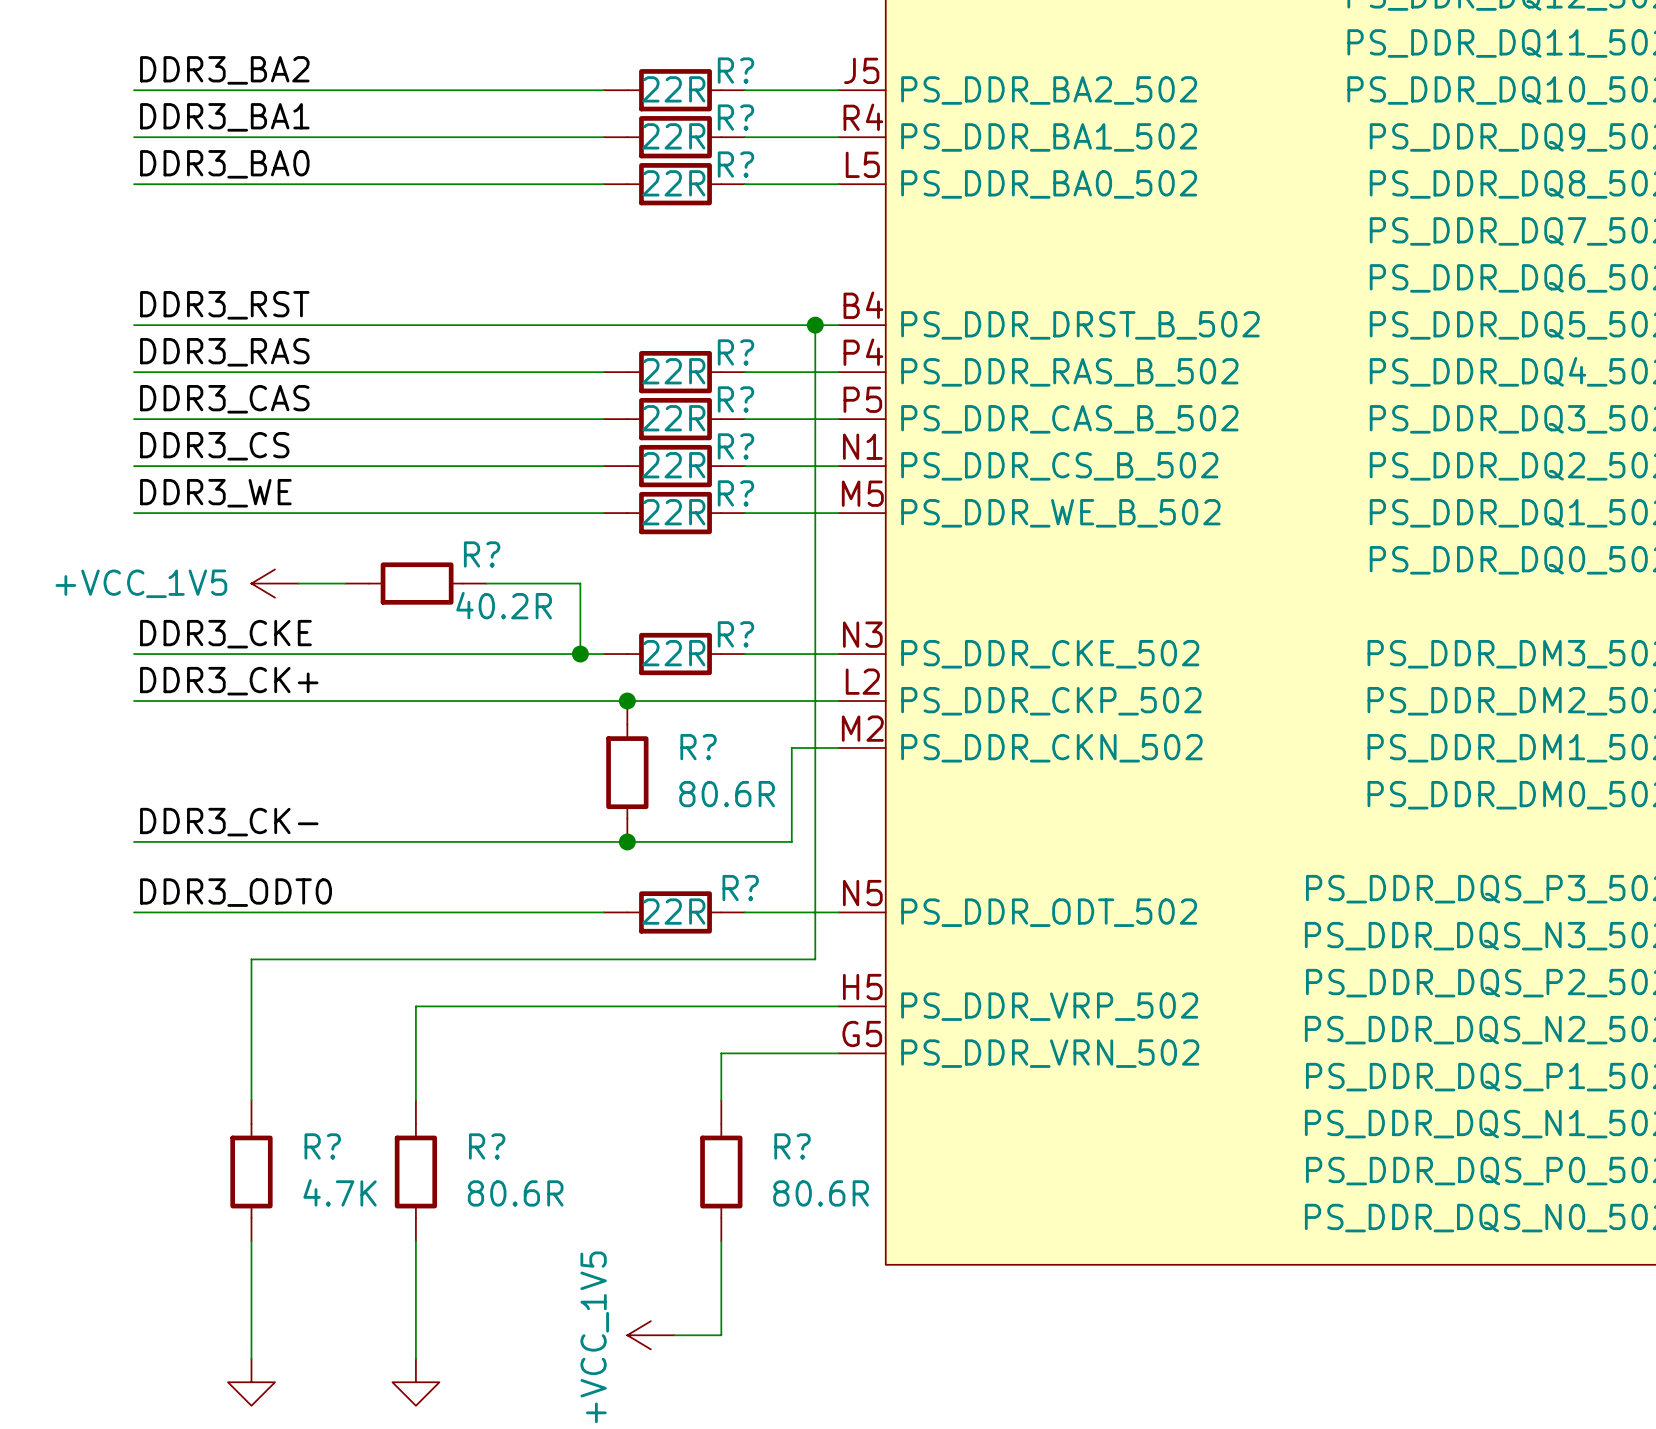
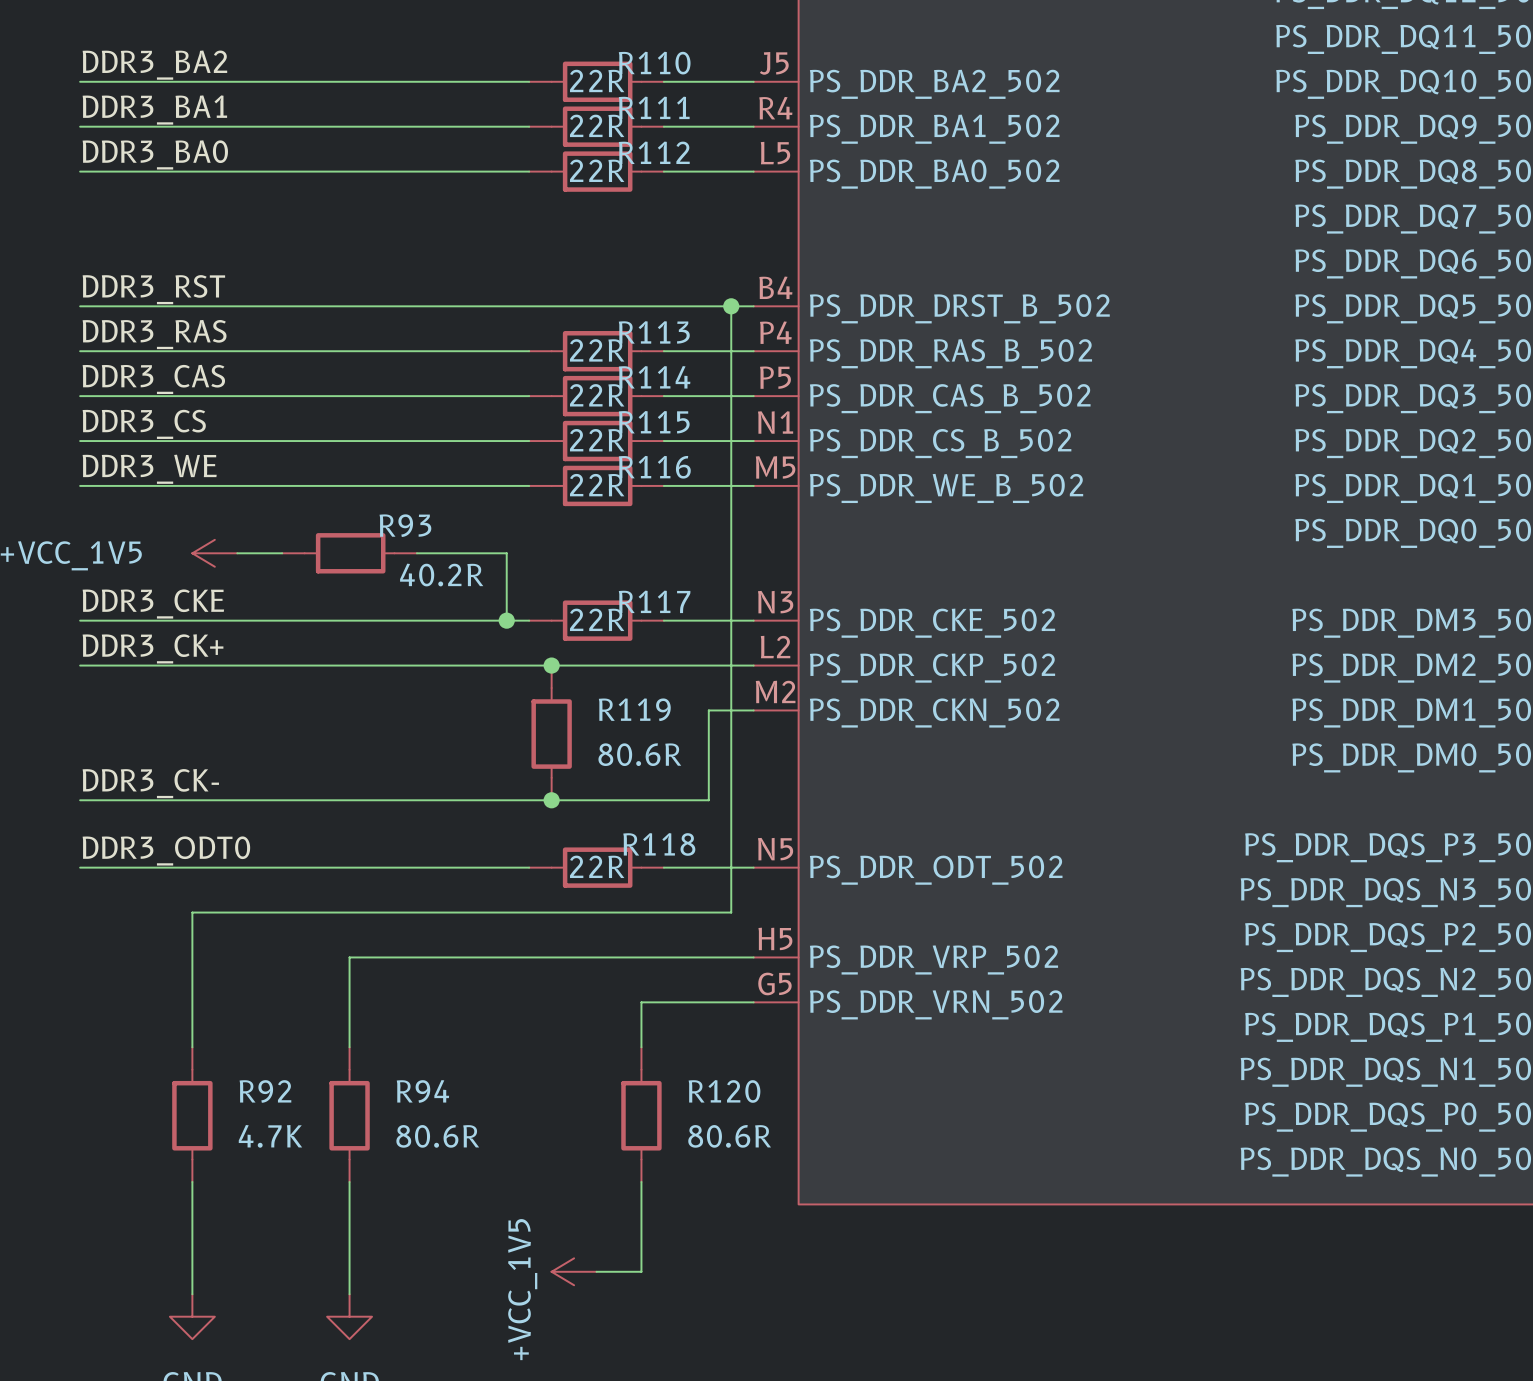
R? name: R? (735, 70) -> R110 (654, 63)
R? name: R? (735, 117) -> R111 (654, 107)
R? name: R? (735, 164) -> R112 (654, 152)
R? name: R? (735, 352) -> R113 (654, 332)
R? name: R? (735, 399) -> R114 (654, 377)
R? name: R? (735, 446) -> R115 (654, 422)
R? name: R? (735, 493) -> R116 (654, 467)
R? name: R? (482, 554) -> R93 (405, 525)
R? name: R? (735, 634) -> R117 (654, 601)
R? name: R? (698, 747) -> R119 (634, 709)
R? name: R? (740, 888) -> R118 (659, 844)
R? name: R? (322, 1146) -> R92 (265, 1091)
R? name: R? (487, 1146) -> R94 (422, 1091)
R? name: R? (792, 1146) -> R120 (724, 1091)

